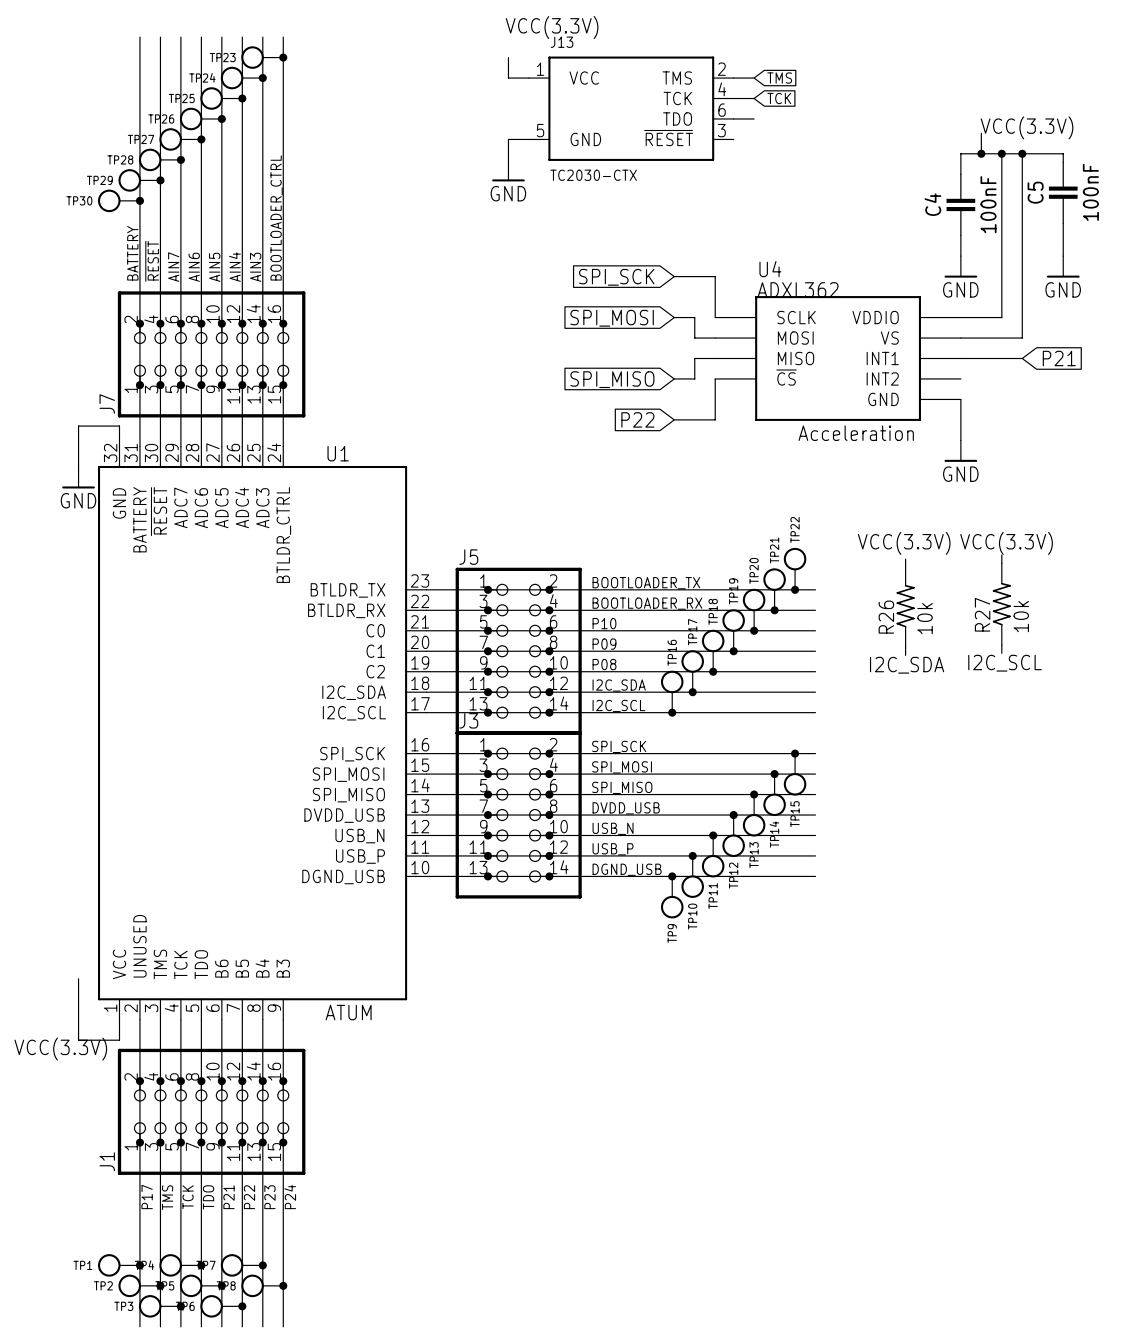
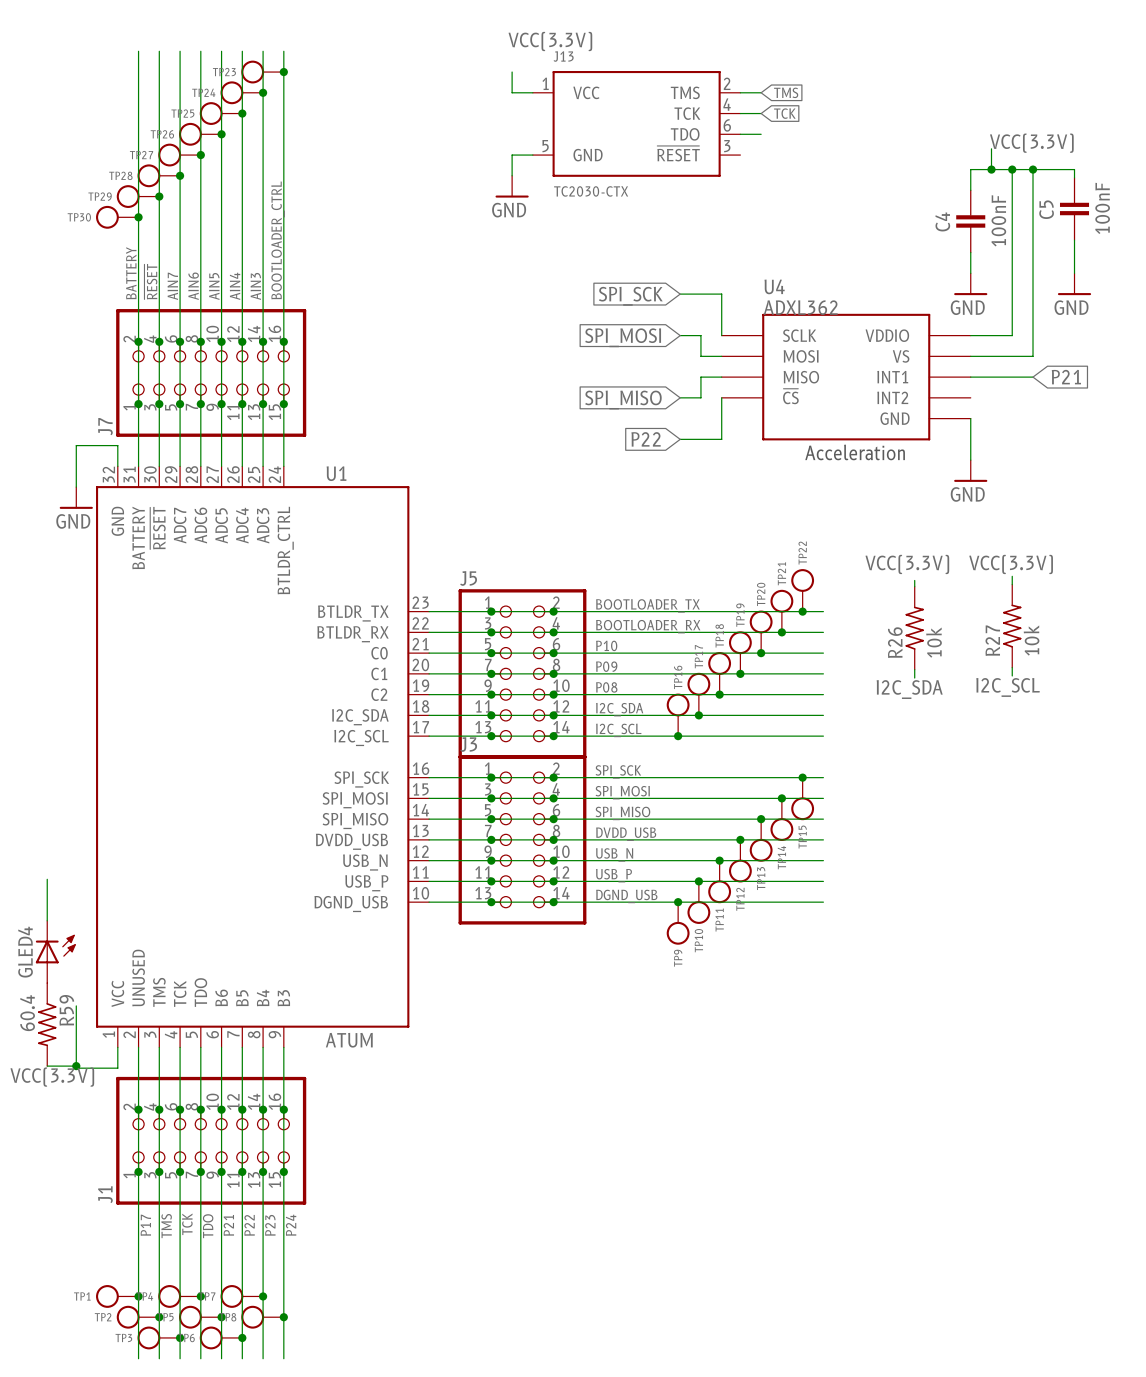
wire: none -> (47, 879) (47, 920)
GLED4: none -> (55, 951)
R59: none -> 60.4 (47, 1024)
wire: none -> (47, 1066) (76, 1066)
junction: none -> (76, 1066)

